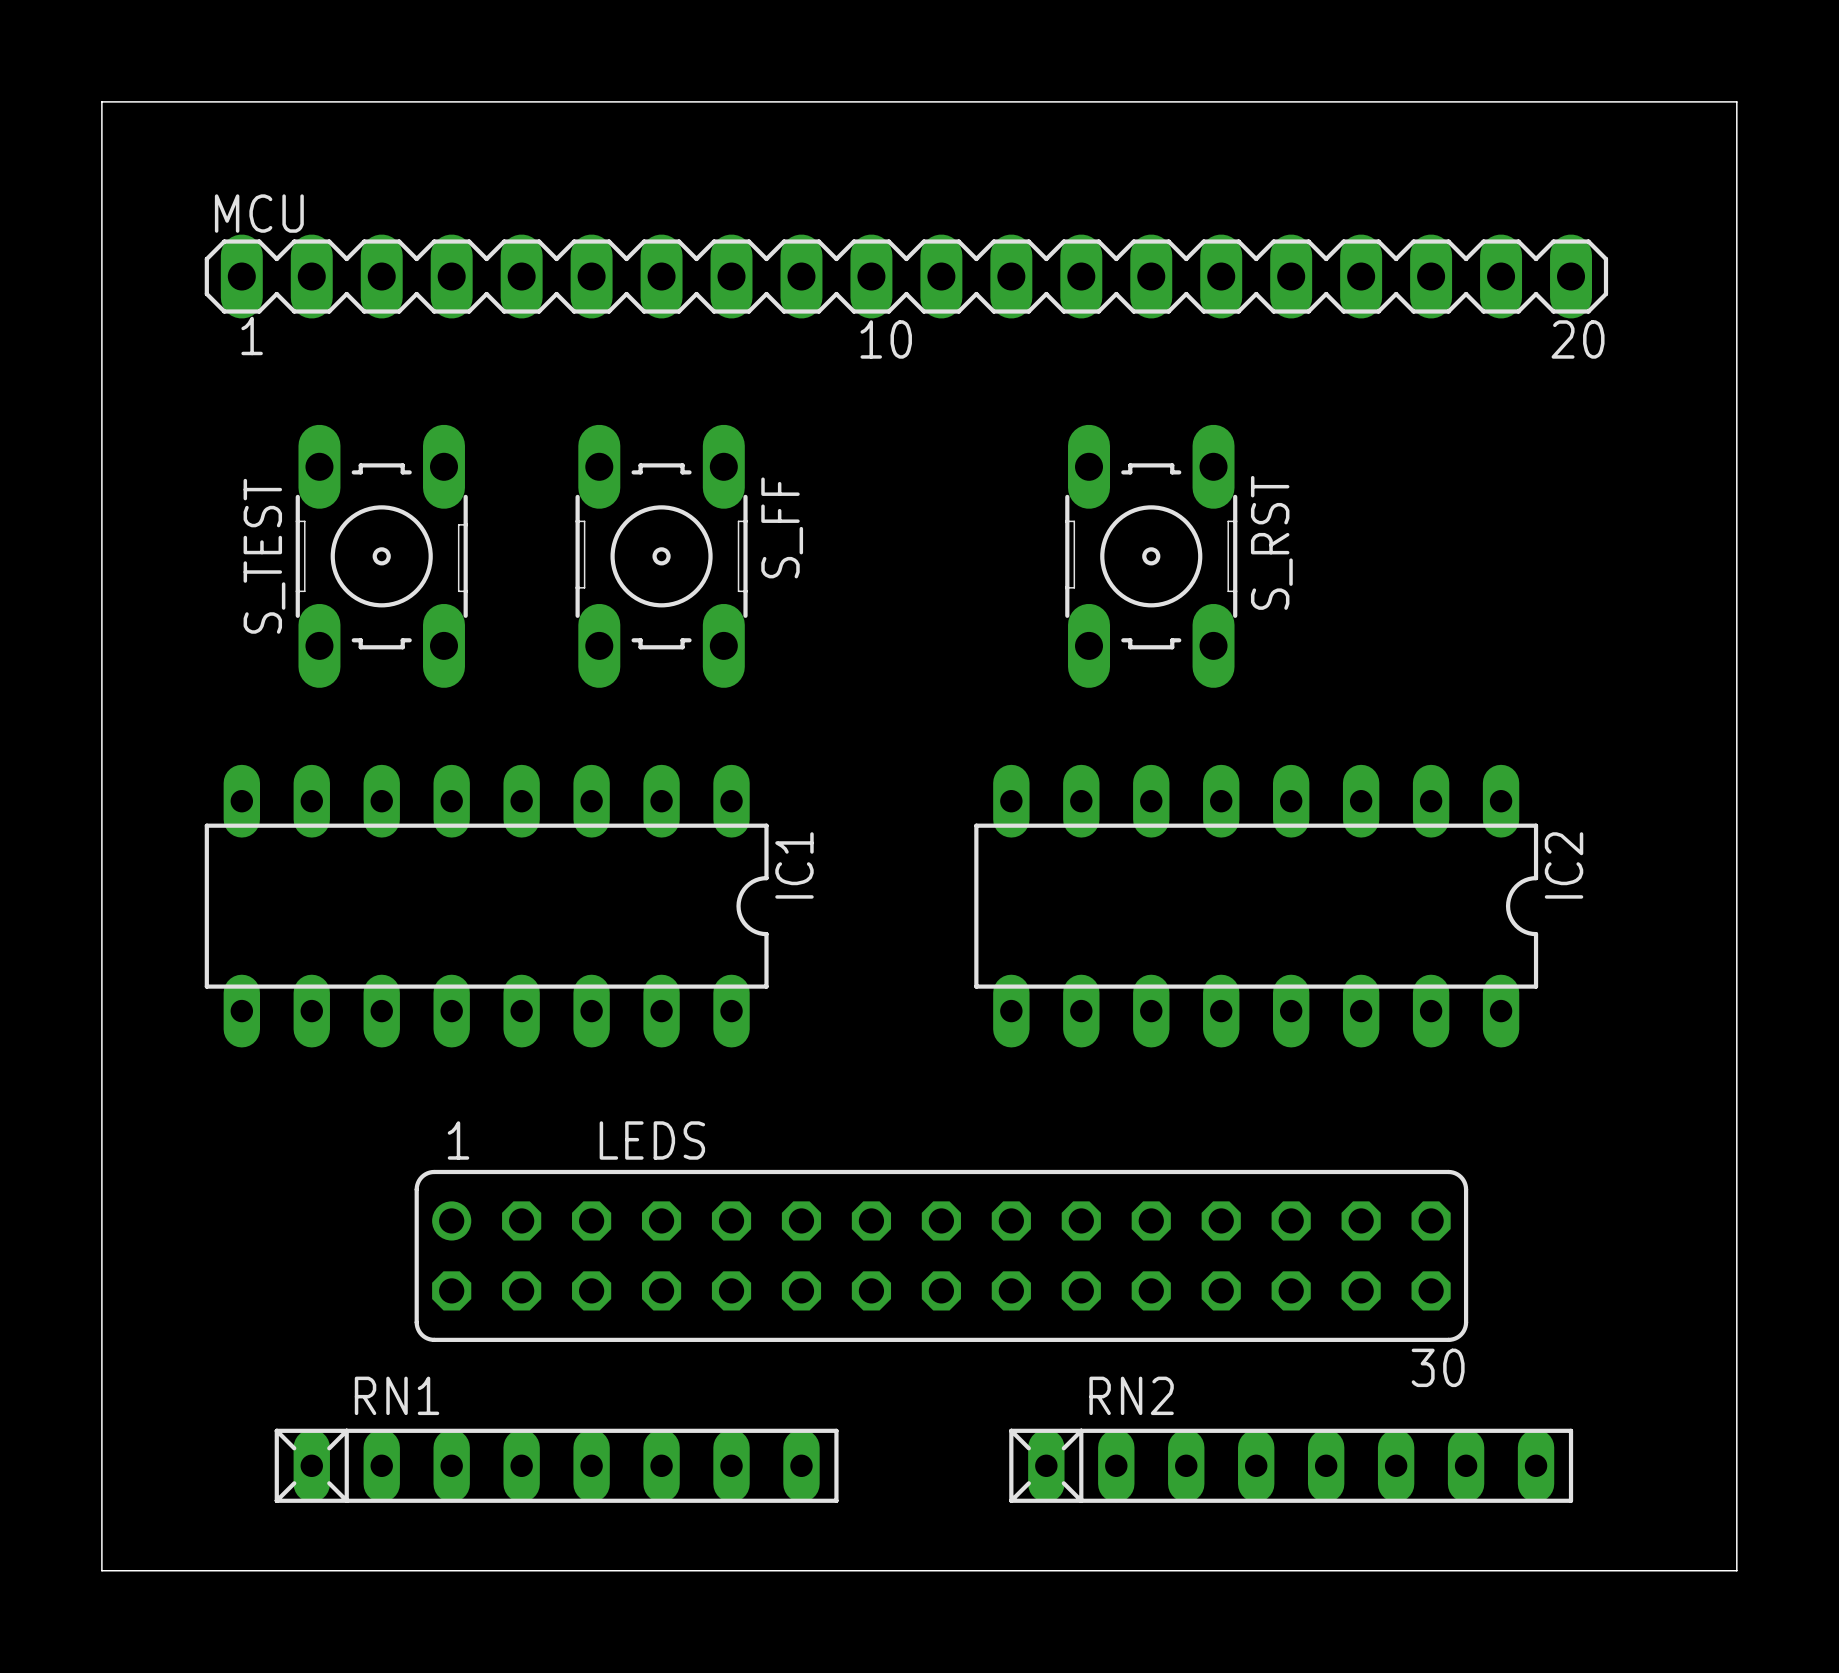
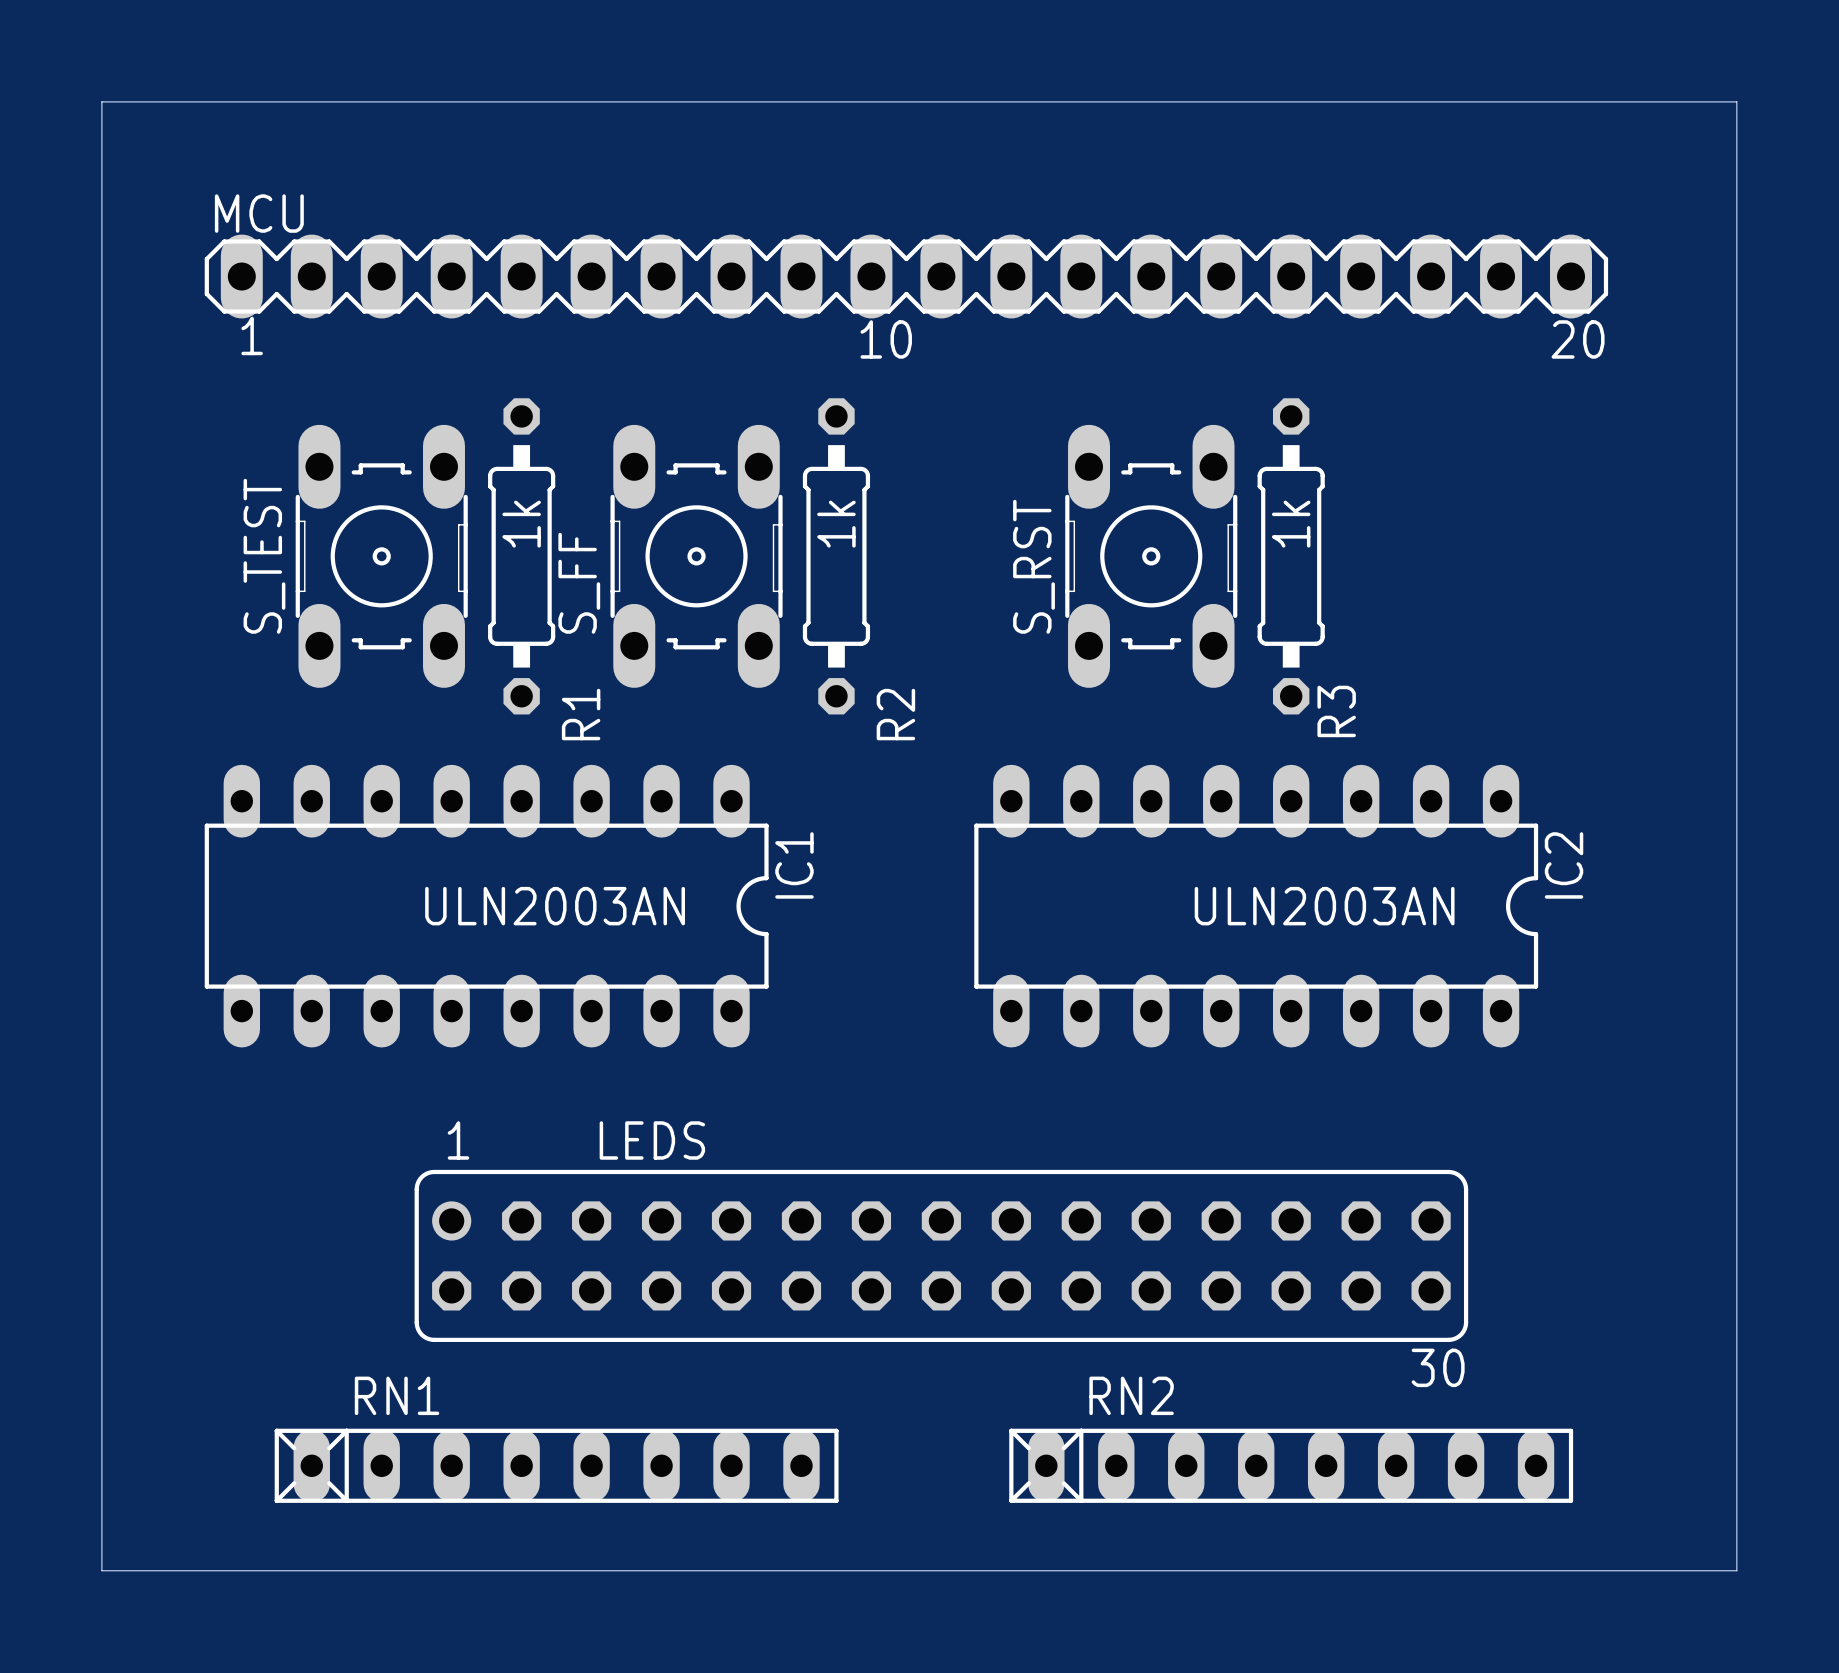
R1: none -> 1k (521, 556)
S_FF rotation: 0° (661, 556) -> 180° (696, 556)
R2: none -> 1k (836, 556)
S_RST rotation: 0° (1151, 556) -> 180° (1151, 556)
R3: none -> 1k (1291, 556)
IC1 value: none -> ULN2003AN (555, 906)
IC2 value: none -> ULN2003AN (1324, 906)

